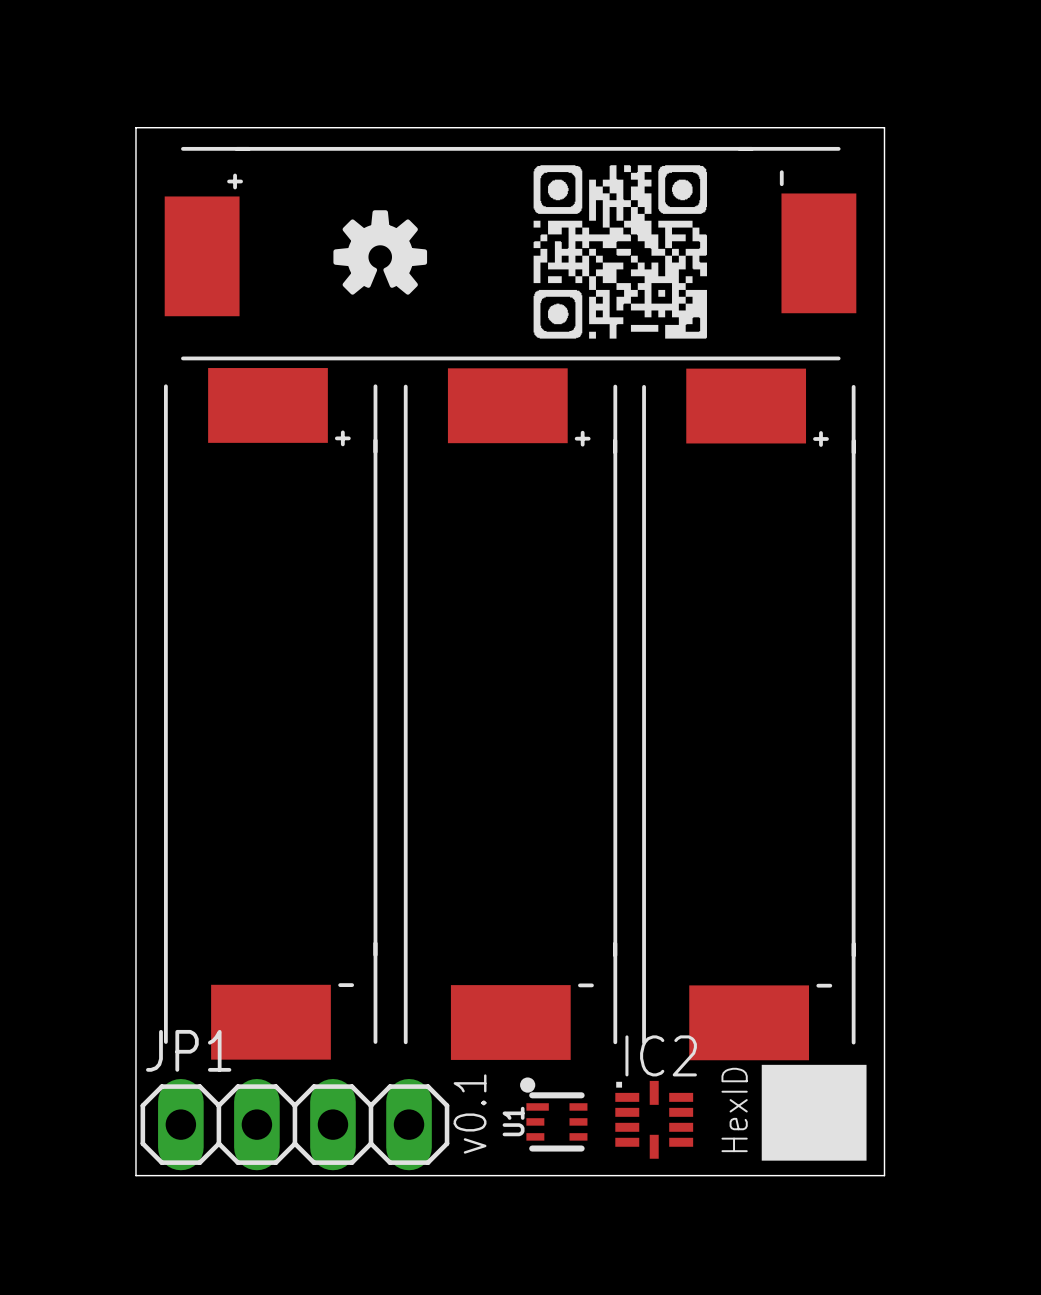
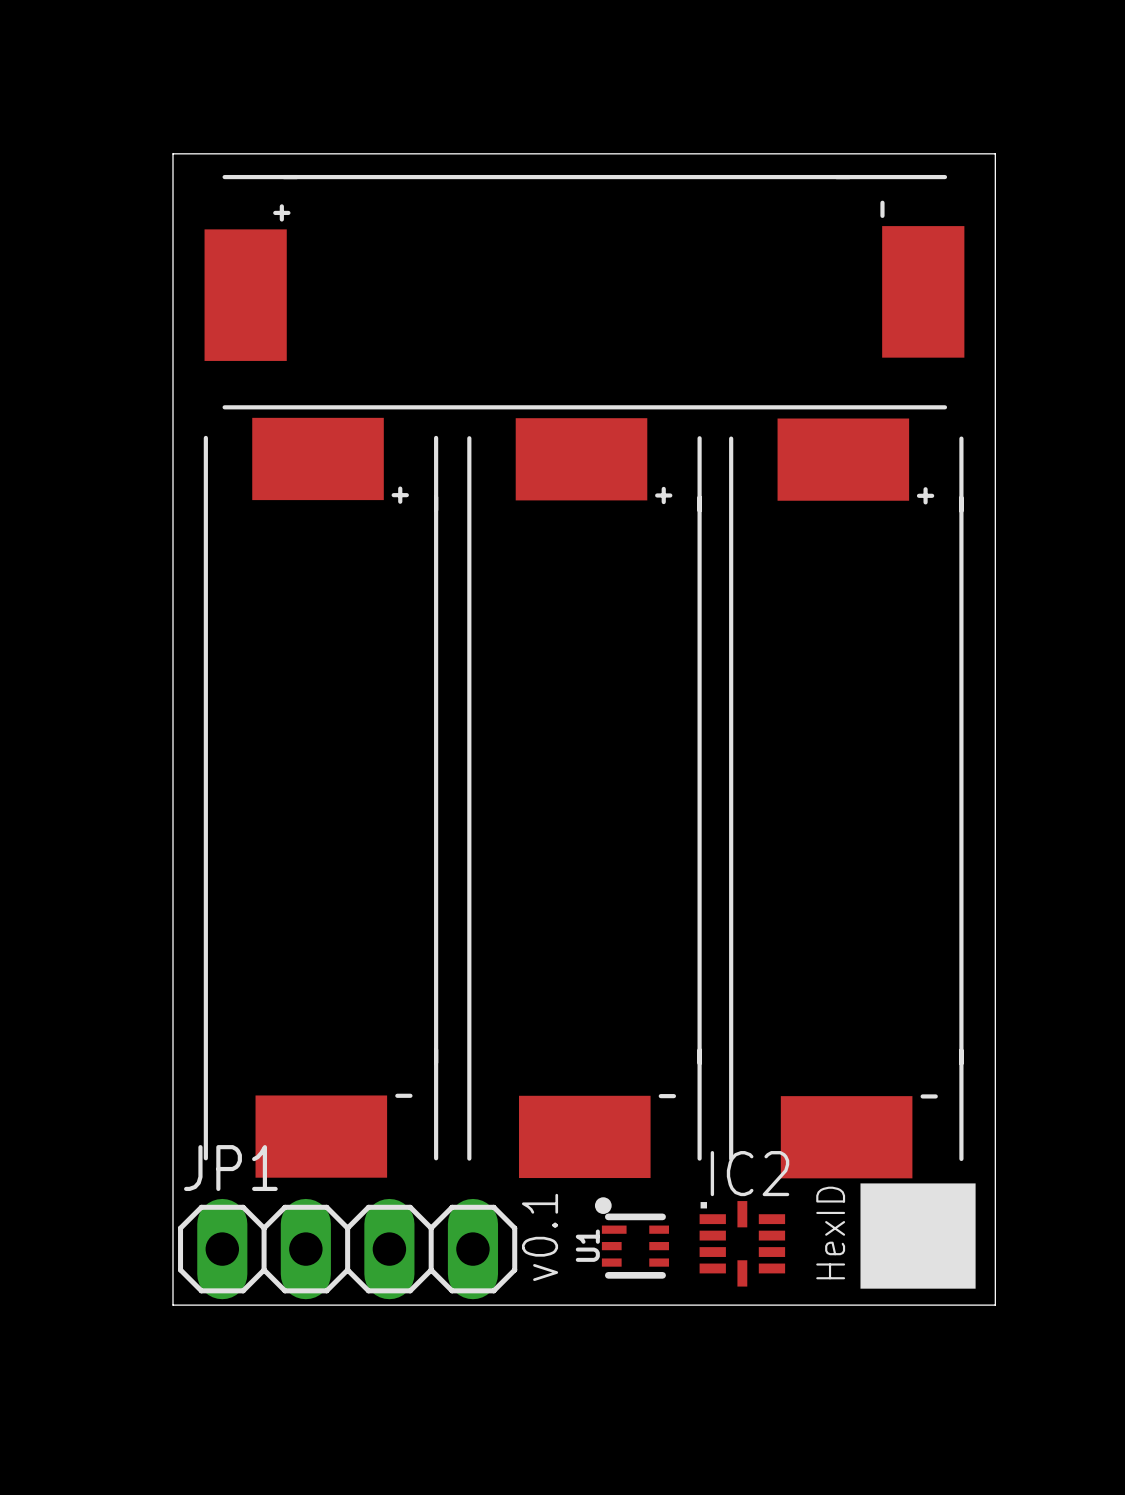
drawing: [533, 165, 707, 339] -> none
drawing: [333, 210, 428, 295] -> none

